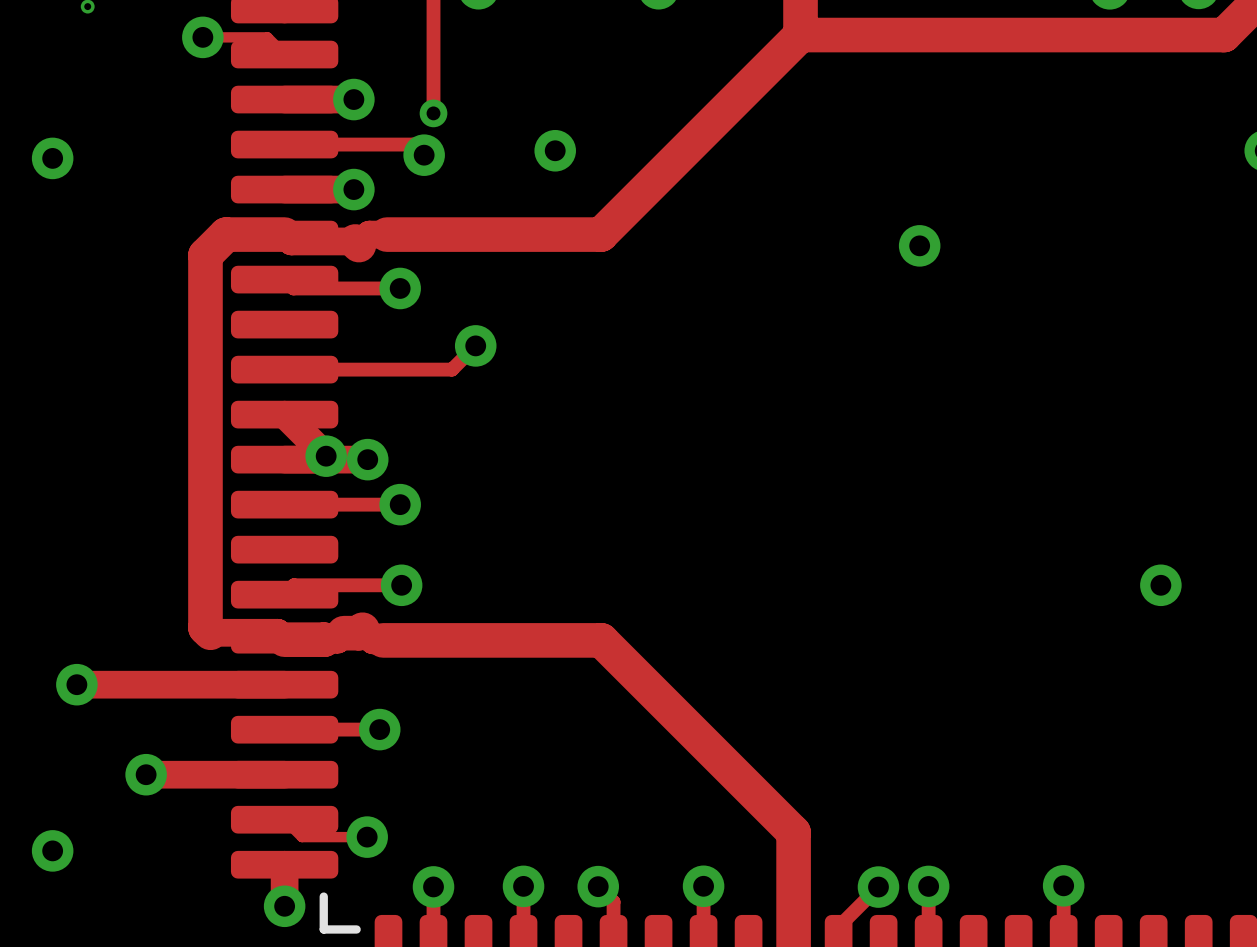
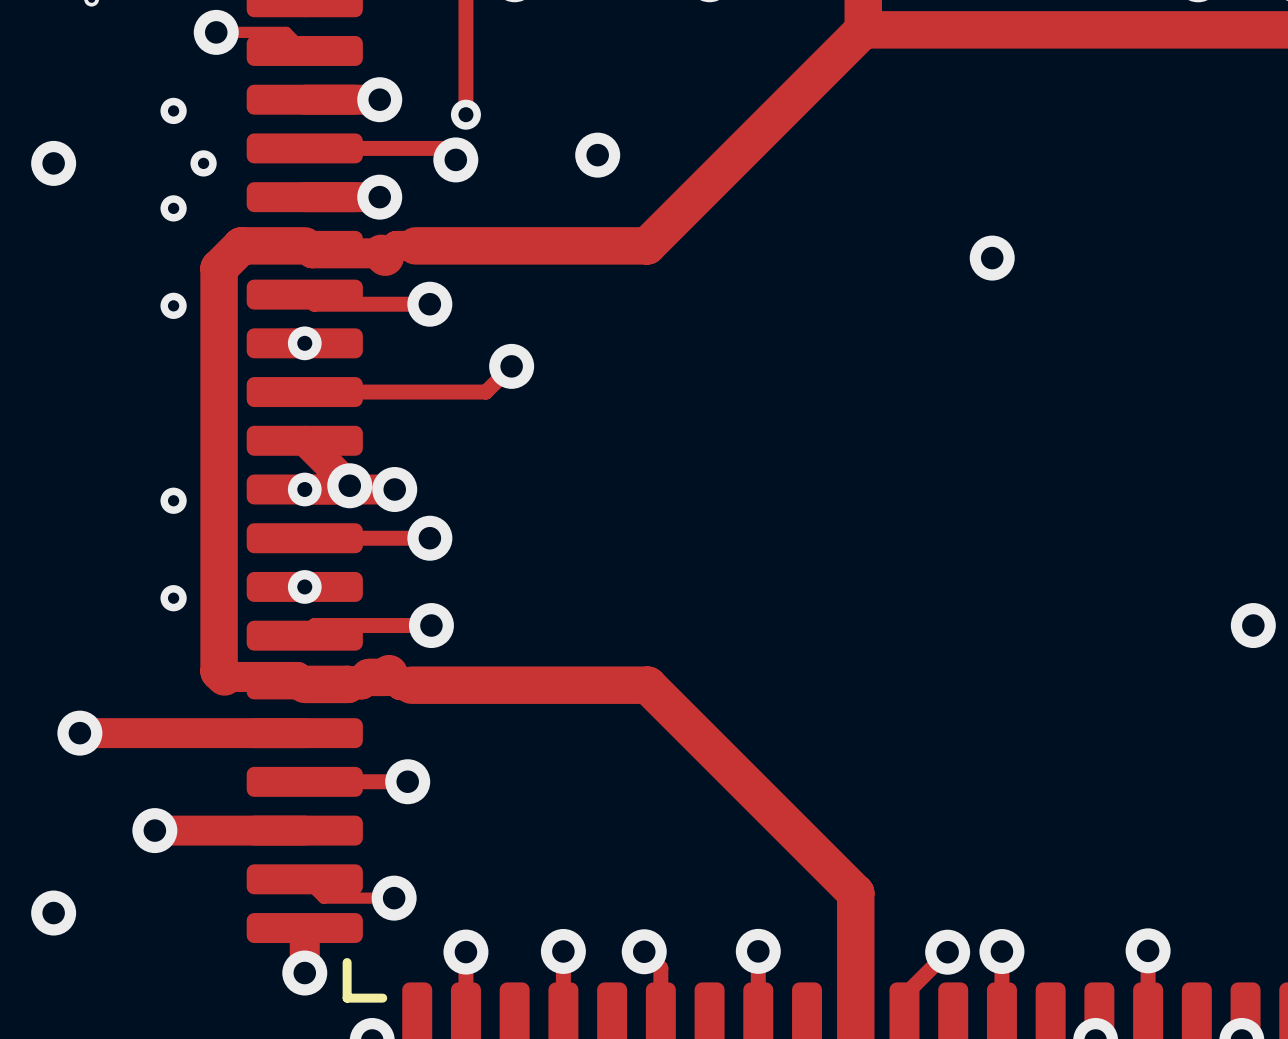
via: none -> (173, 110)
via: none -> (203, 163)
via: none -> (173, 208)
via: none -> (173, 305)
via: none -> (304, 343)
via: none -> (304, 489)
via: none -> (173, 500)
via: none -> (304, 586)
via: none -> (173, 598)

